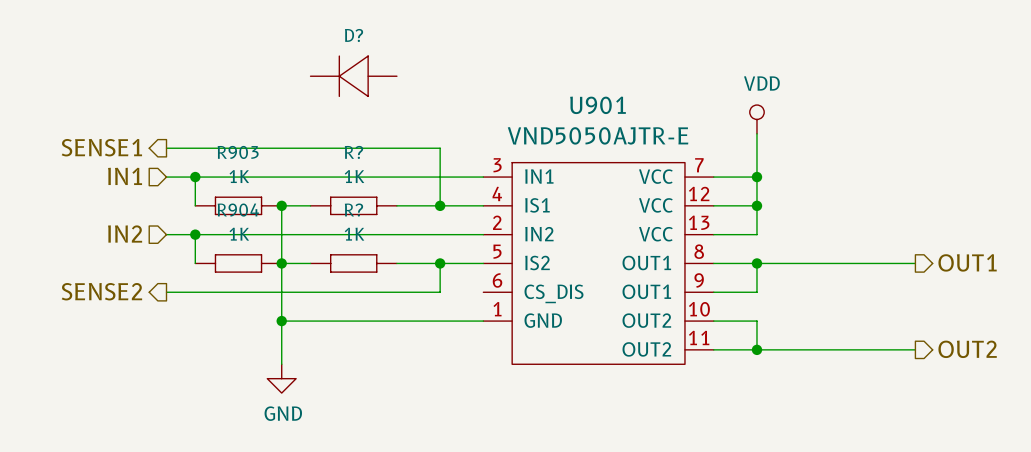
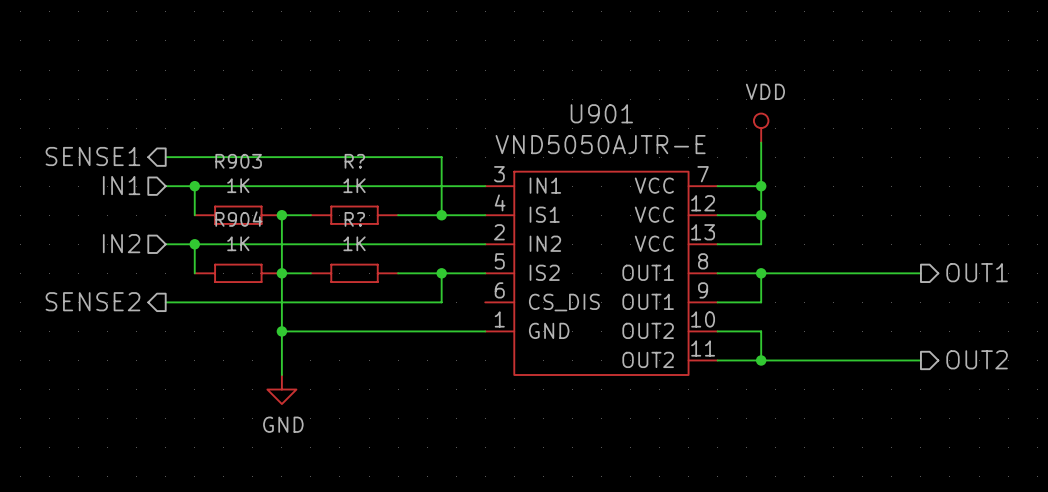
D?: (353, 76) -> none

